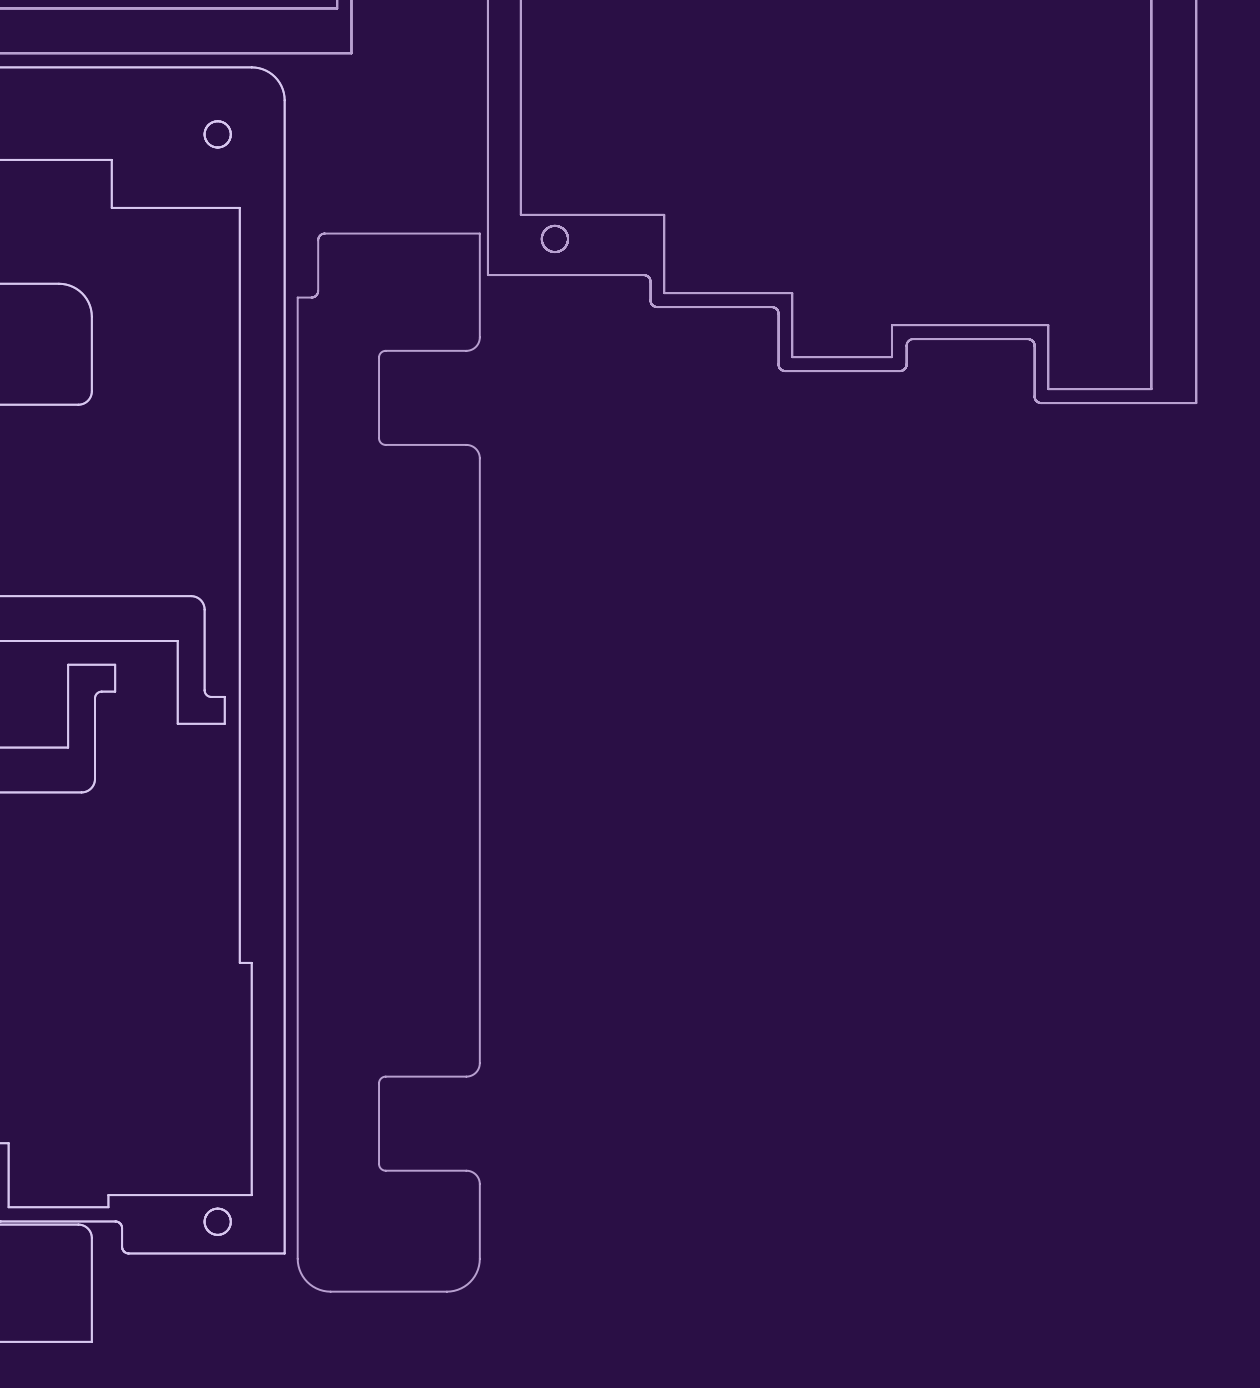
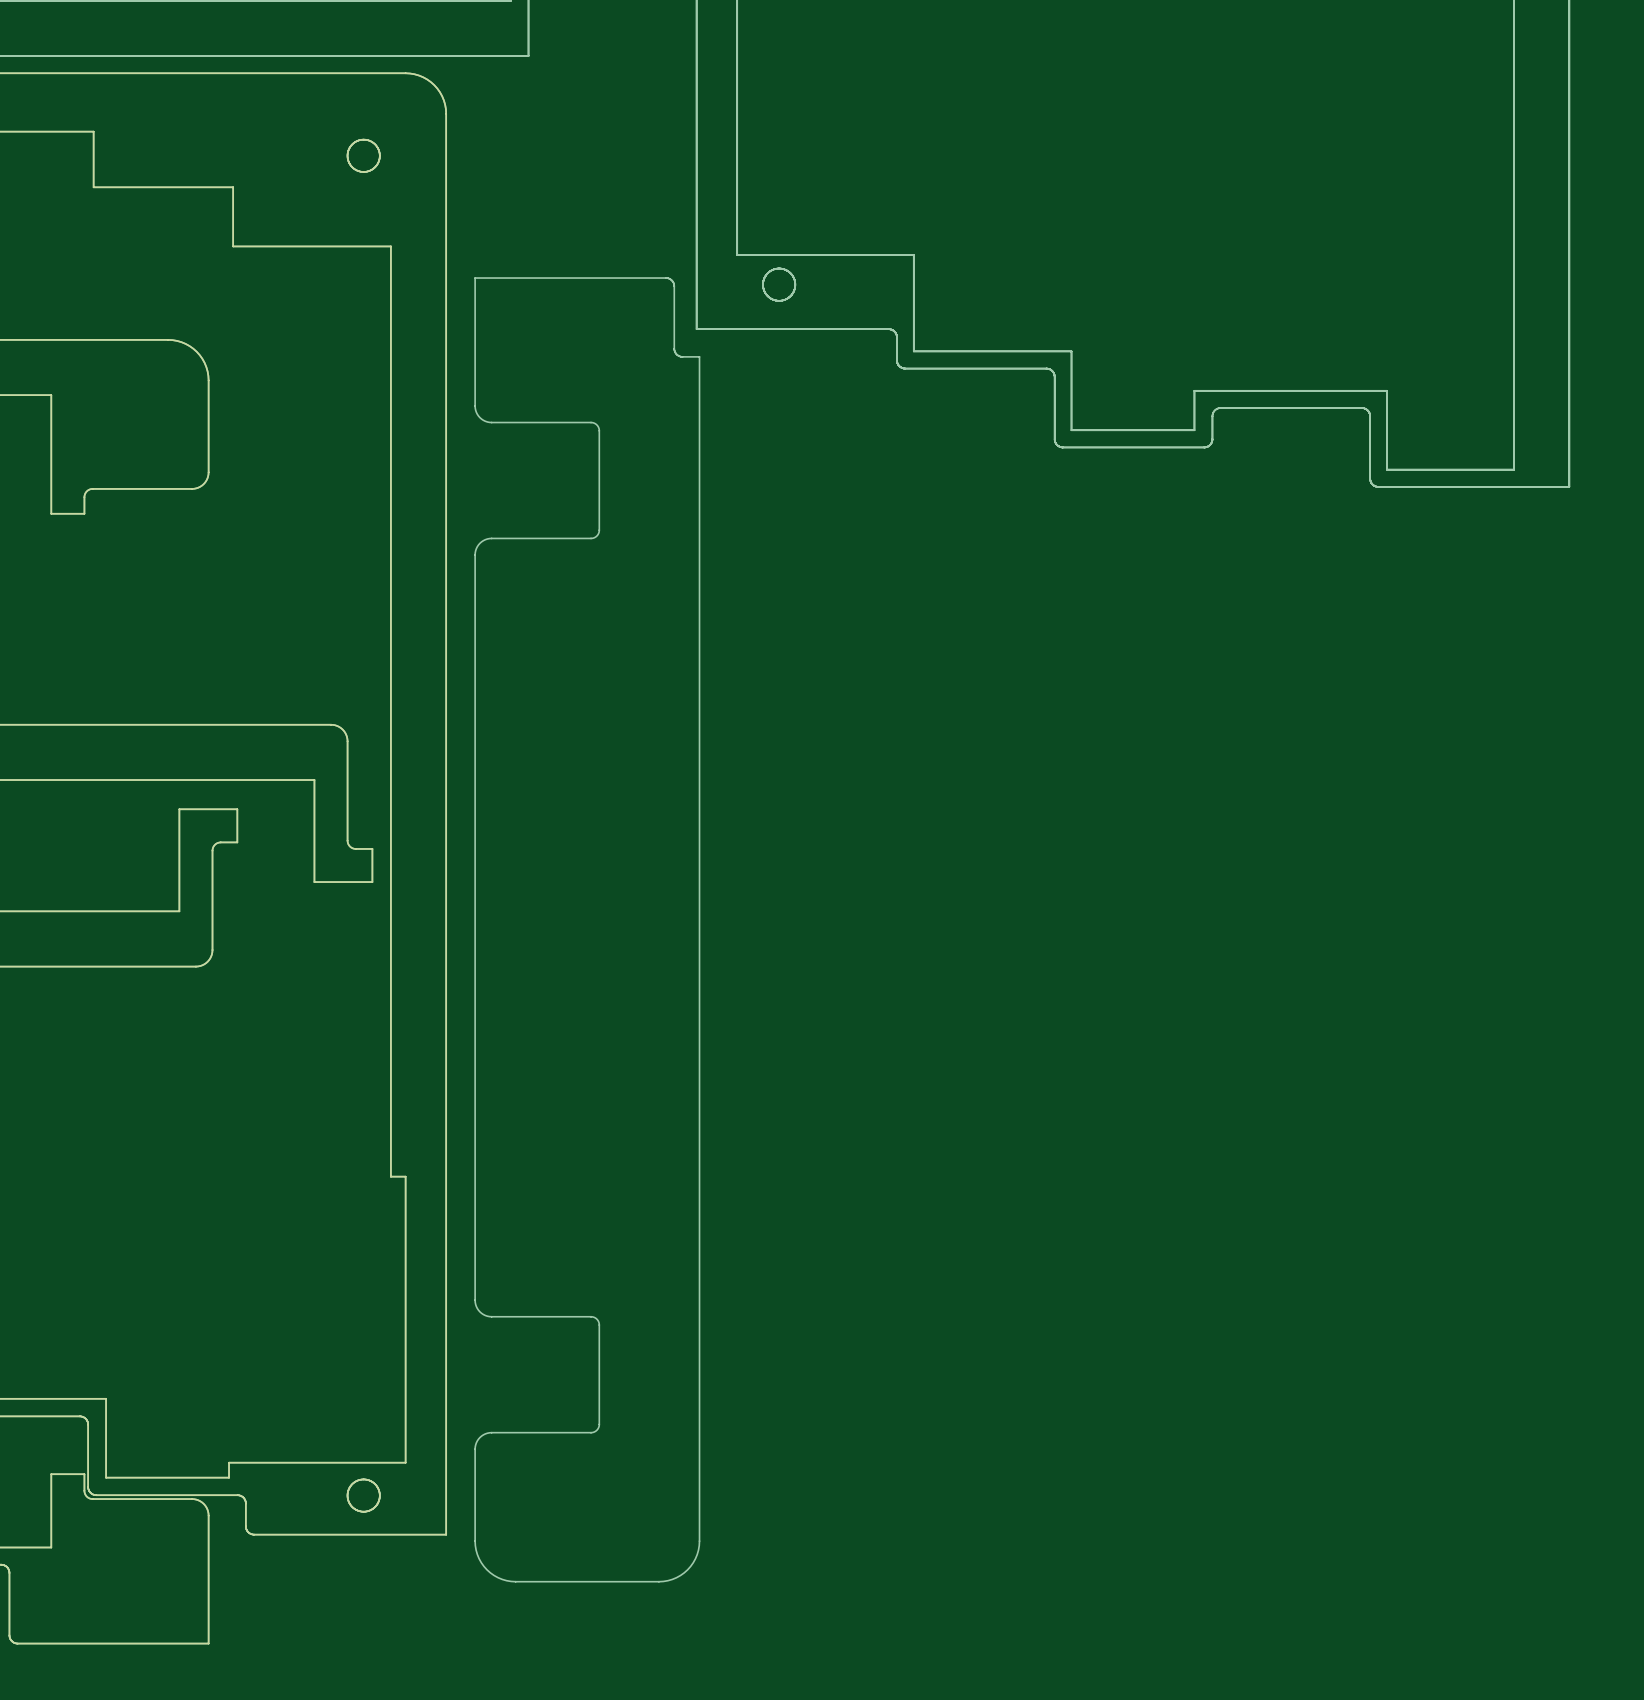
line: (324, 233) (320, 235) (318, 240) -> (495, 278) (475, 278) (475, 405) (477, 414) (481, 419) (489, 422) (570, 422)
line: (463, 233) (479, 233) (479, 337) (478, 344) (468, 350) (402, 350) -> (666, 277) (671, 280) (674, 286)
line: (318, 240) (317, 293) (313, 297) (297, 297) (297, 1258) (300, 1273) (310, 1284) (323, 1290) (341, 1291) -> none
line: none -> (674, 286) (674, 351) (680, 356) (699, 356) (699, 1541) (695, 1558) (684, 1572) (667, 1580) (646, 1581)
line: (385, 350) (380, 352) (379, 357) (379, 439) (381, 443) (385, 444) -> (570, 1316) (489, 1316) (478, 1310) (475, 1300) (475, 552) (479, 543) (489, 538) (570, 538)
line: (402, 444) (468, 445) (477, 450) (479, 458) (479, 1064) (475, 1072) (468, 1076) (402, 1076) -> (591, 538) (596, 536) (599, 530) (599, 429) (596, 424) (591, 422)
line: (385, 1076) (380, 1078) (379, 1083) (379, 1164) (380, 1168) (385, 1170) -> (515, 1581) (502, 1579) (490, 1572) (481, 1562) (476, 1550) (476, 1442) (481, 1436) (489, 1432) (570, 1432)
line: (402, 1170) (468, 1170) (474, 1173) (478, 1179) (479, 1266) (474, 1276) (467, 1284) (457, 1289) (446, 1291) -> (591, 1432) (596, 1430) (599, 1424) (599, 1323) (596, 1319) (591, 1316)

